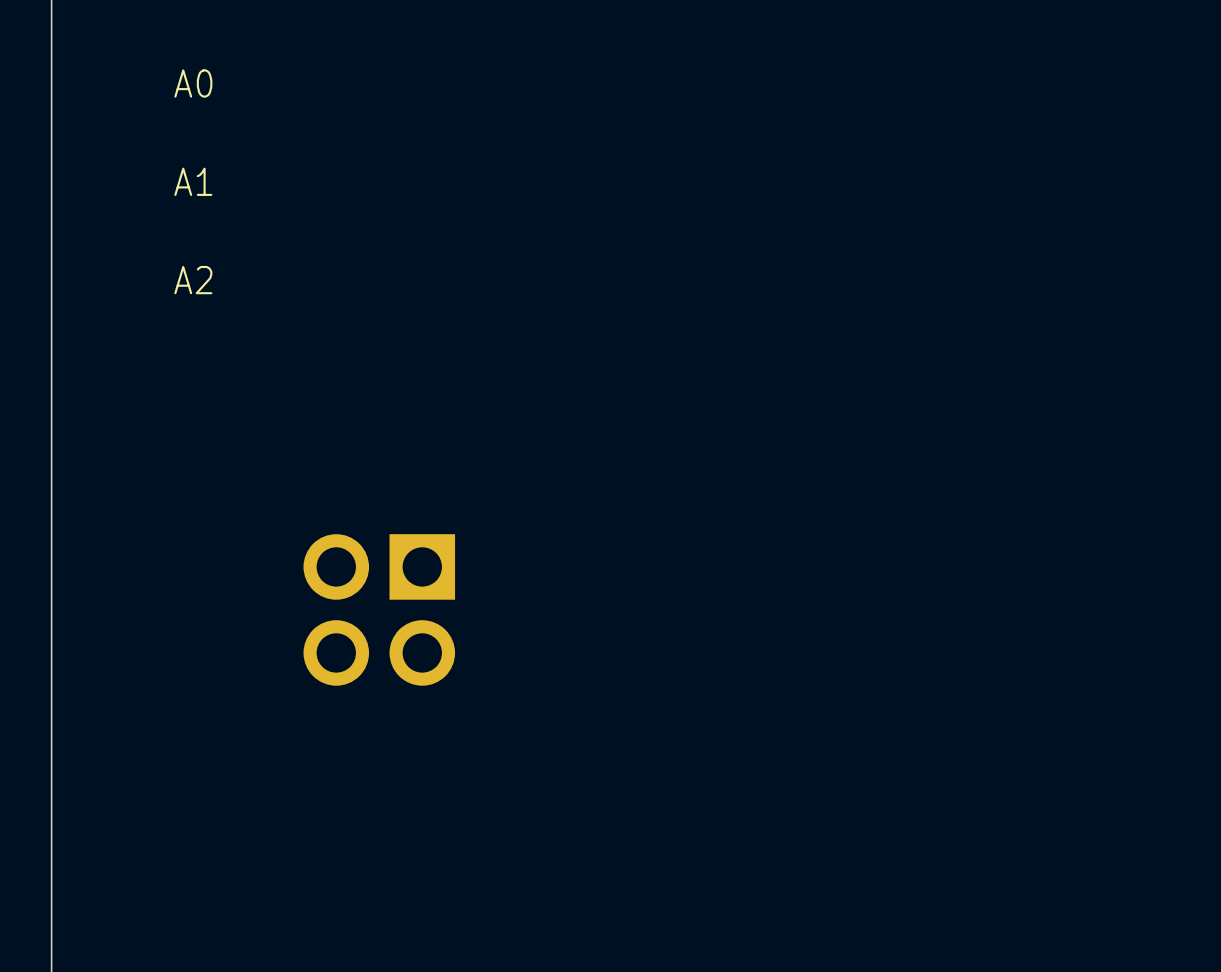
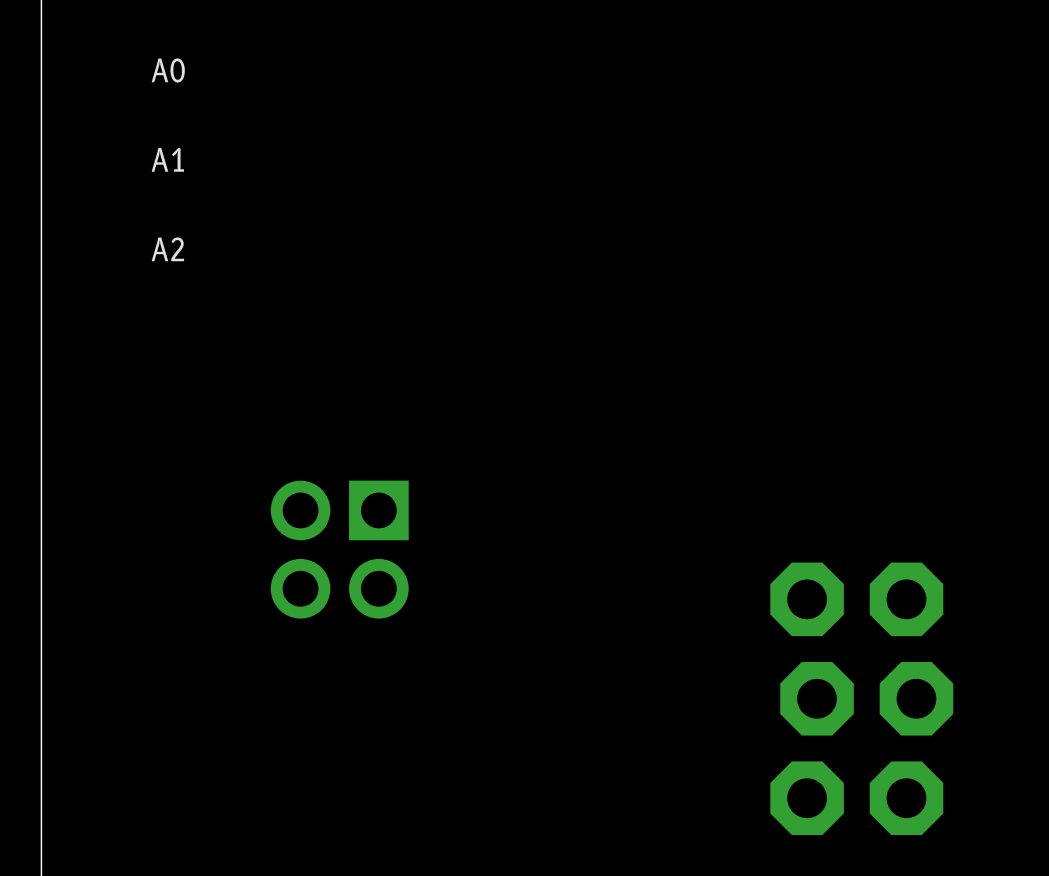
part: none -> (861, 698)

